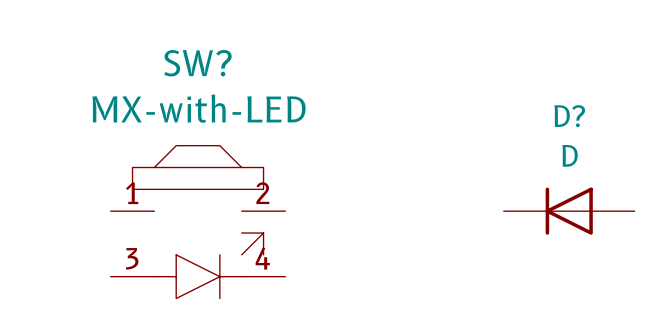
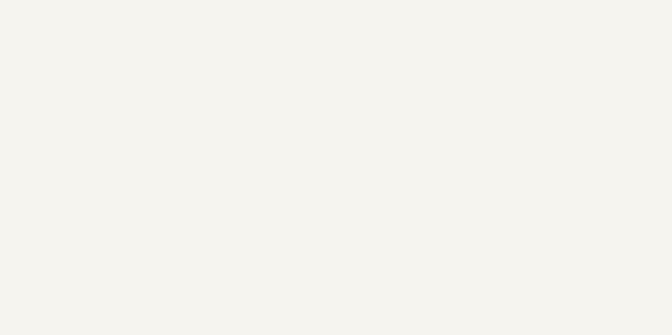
D?: D (569, 211) -> none
SW?: MX-with-LED (198, 222) -> none

